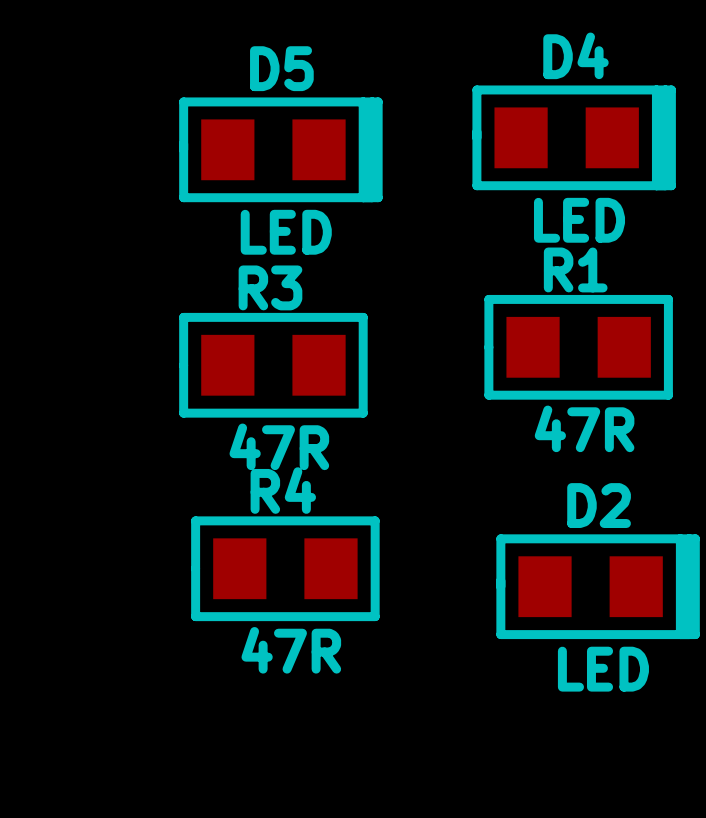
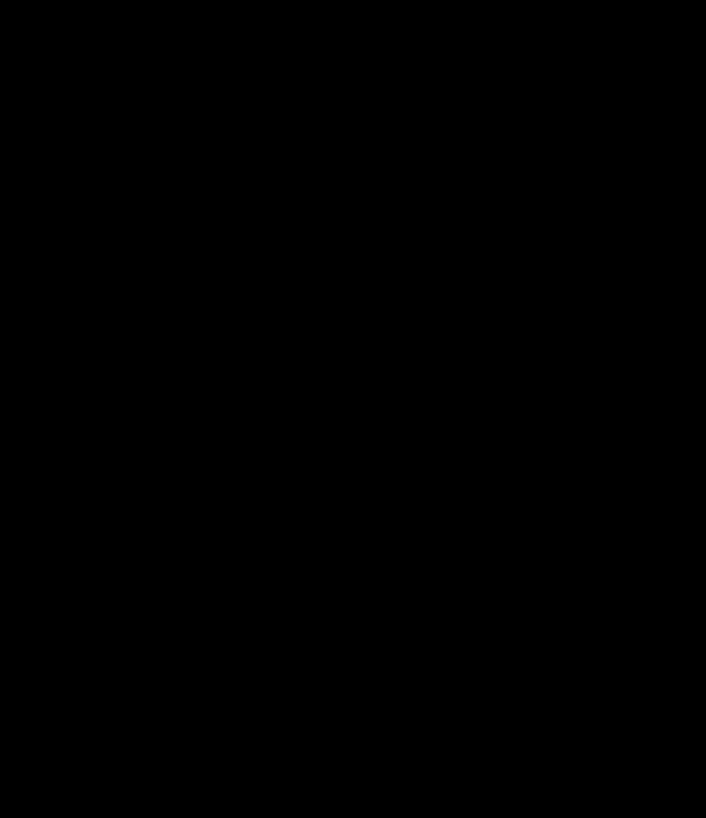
D4: LED (574, 137) -> none
D5: LED (280, 149) -> none
R1: 47R (578, 347) -> none
R3: 47R (273, 365) -> none
R4: 47R (285, 568) -> none
D2: LED (598, 586) -> none

